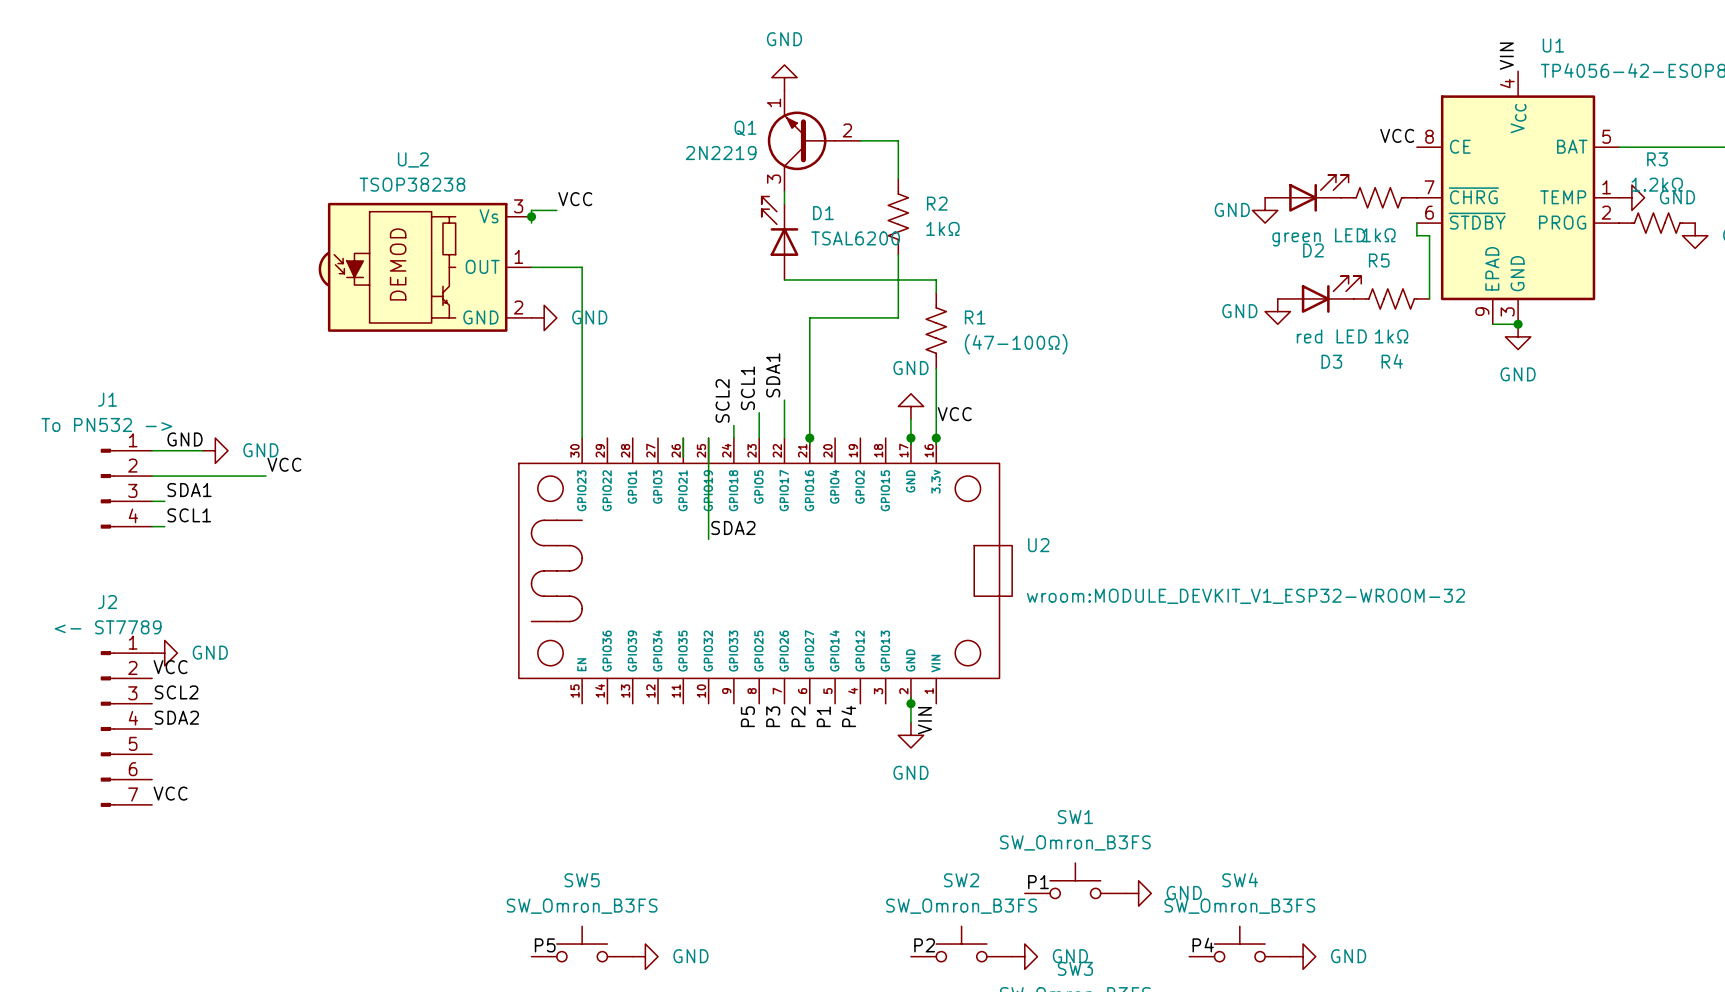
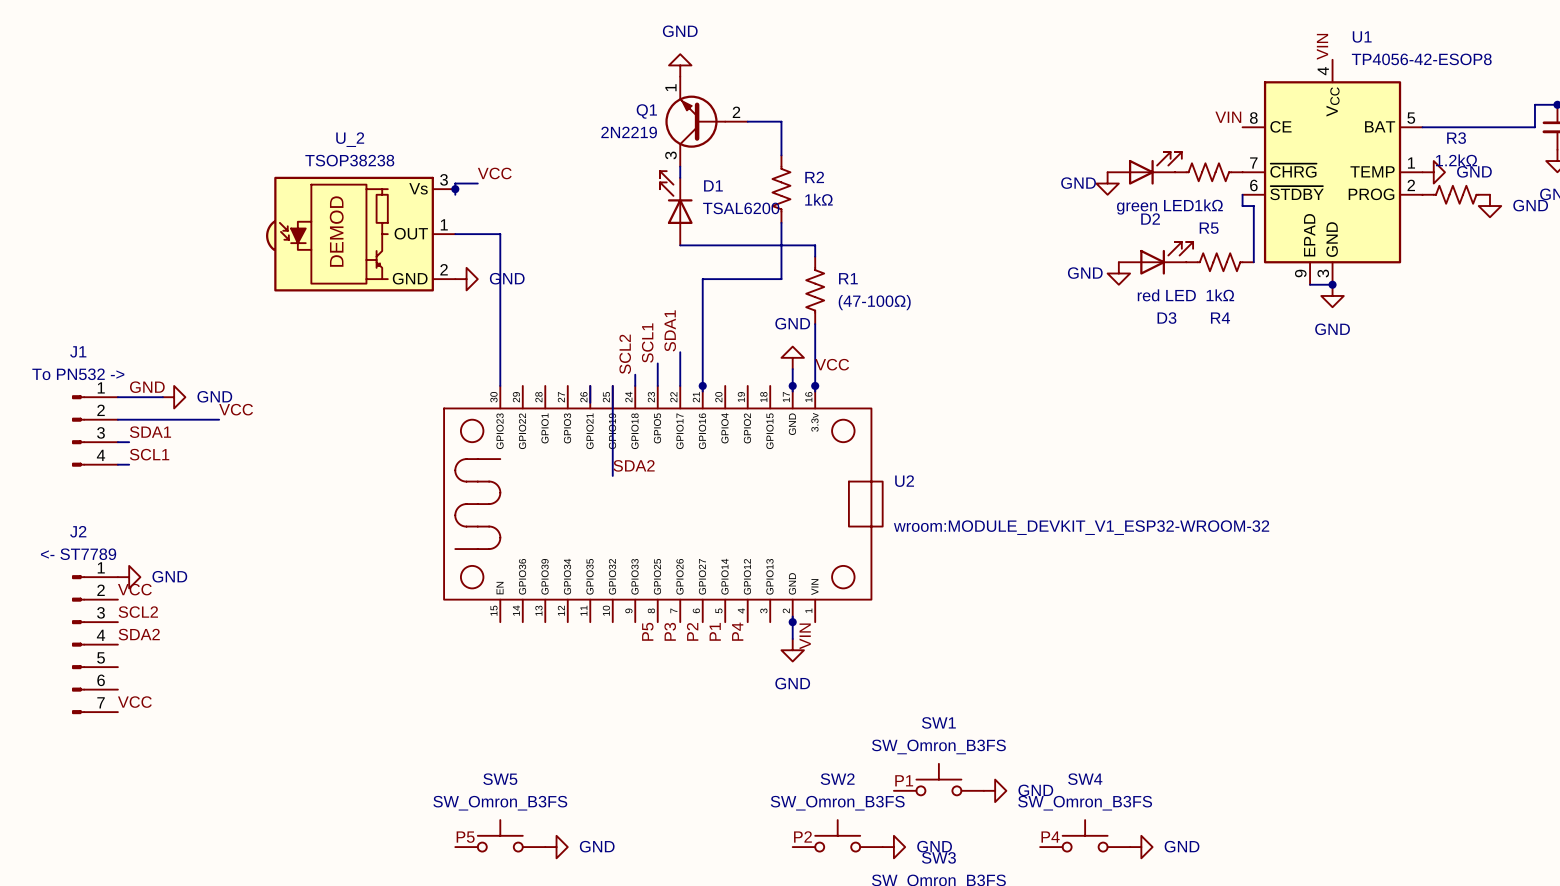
label: VCC (1397, 135) -> VIN (1228, 117)

